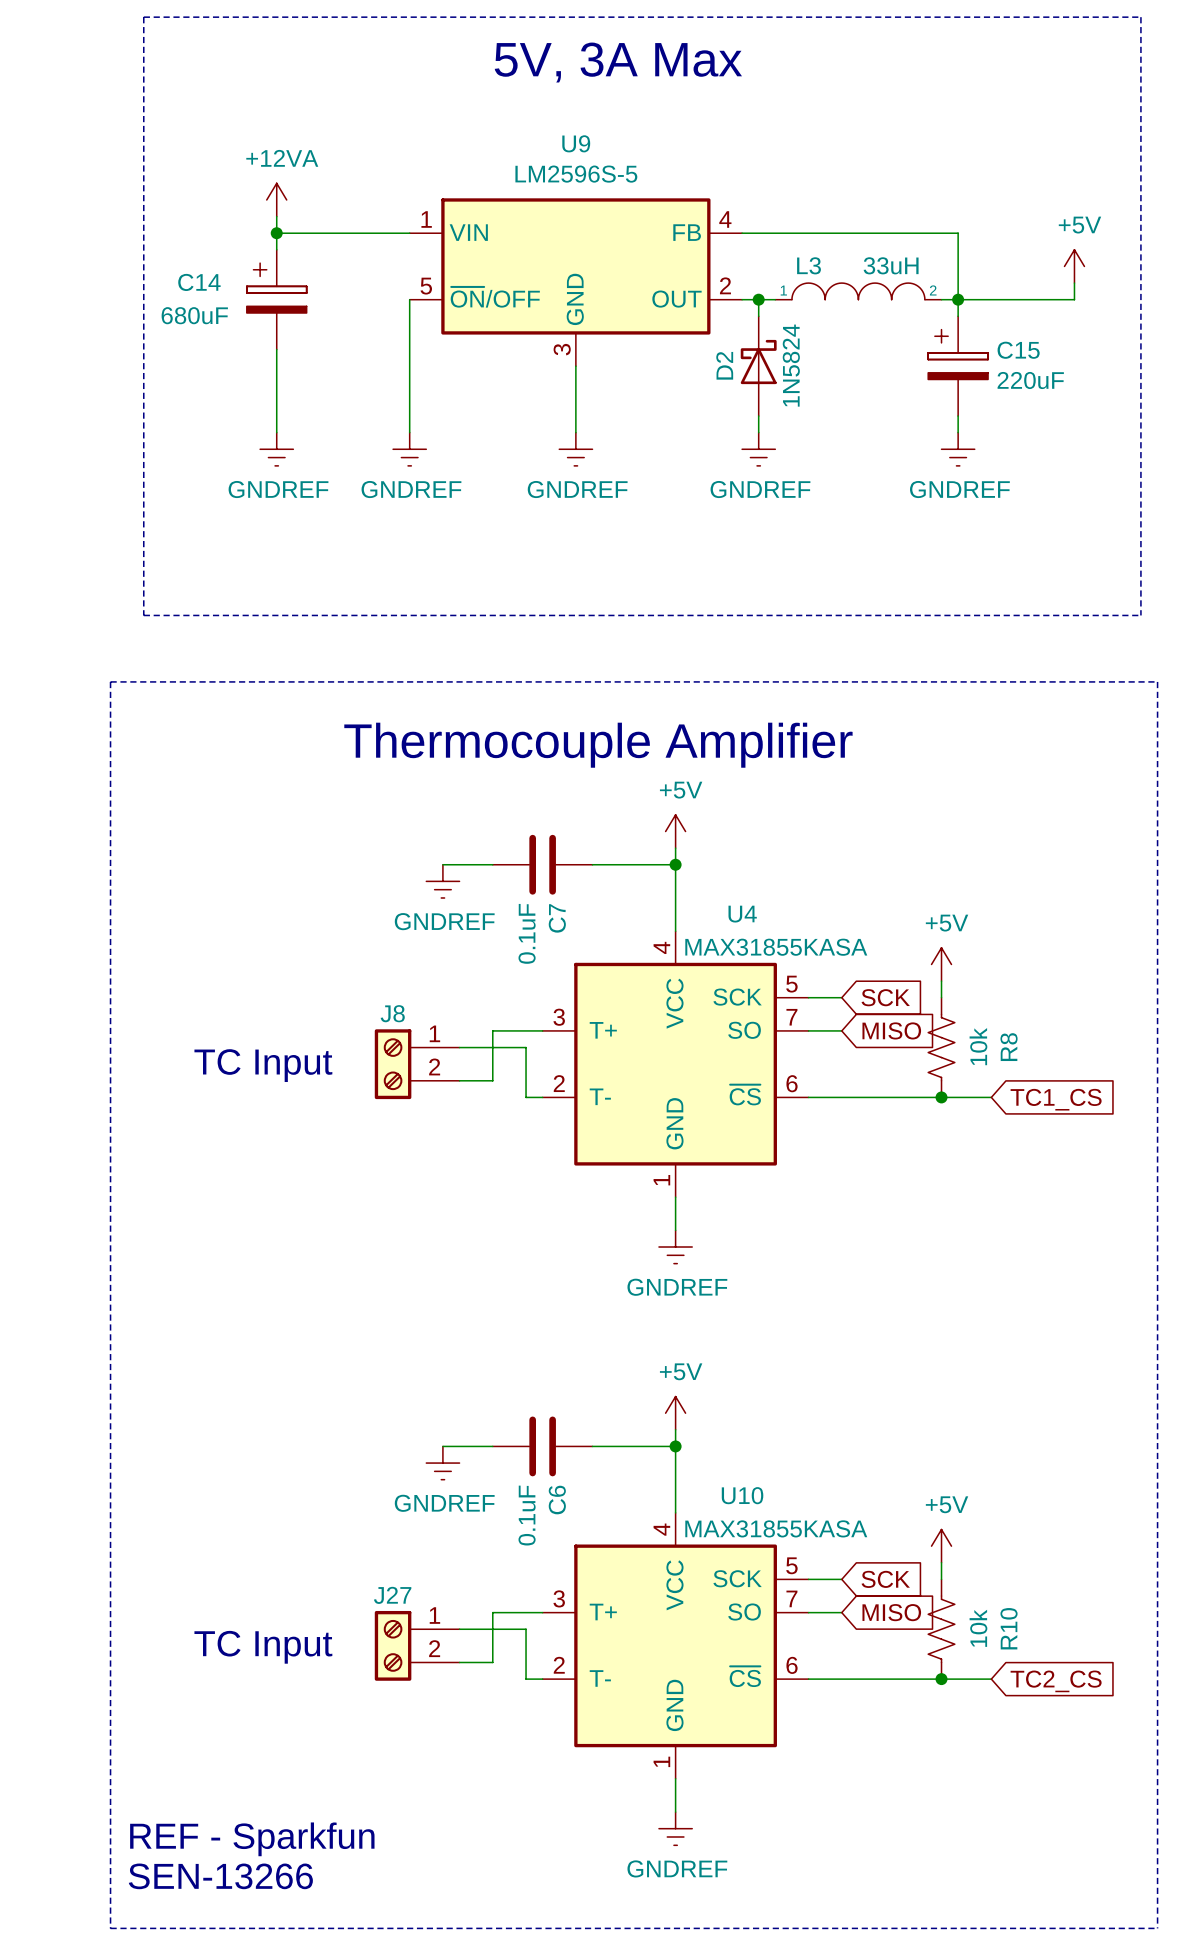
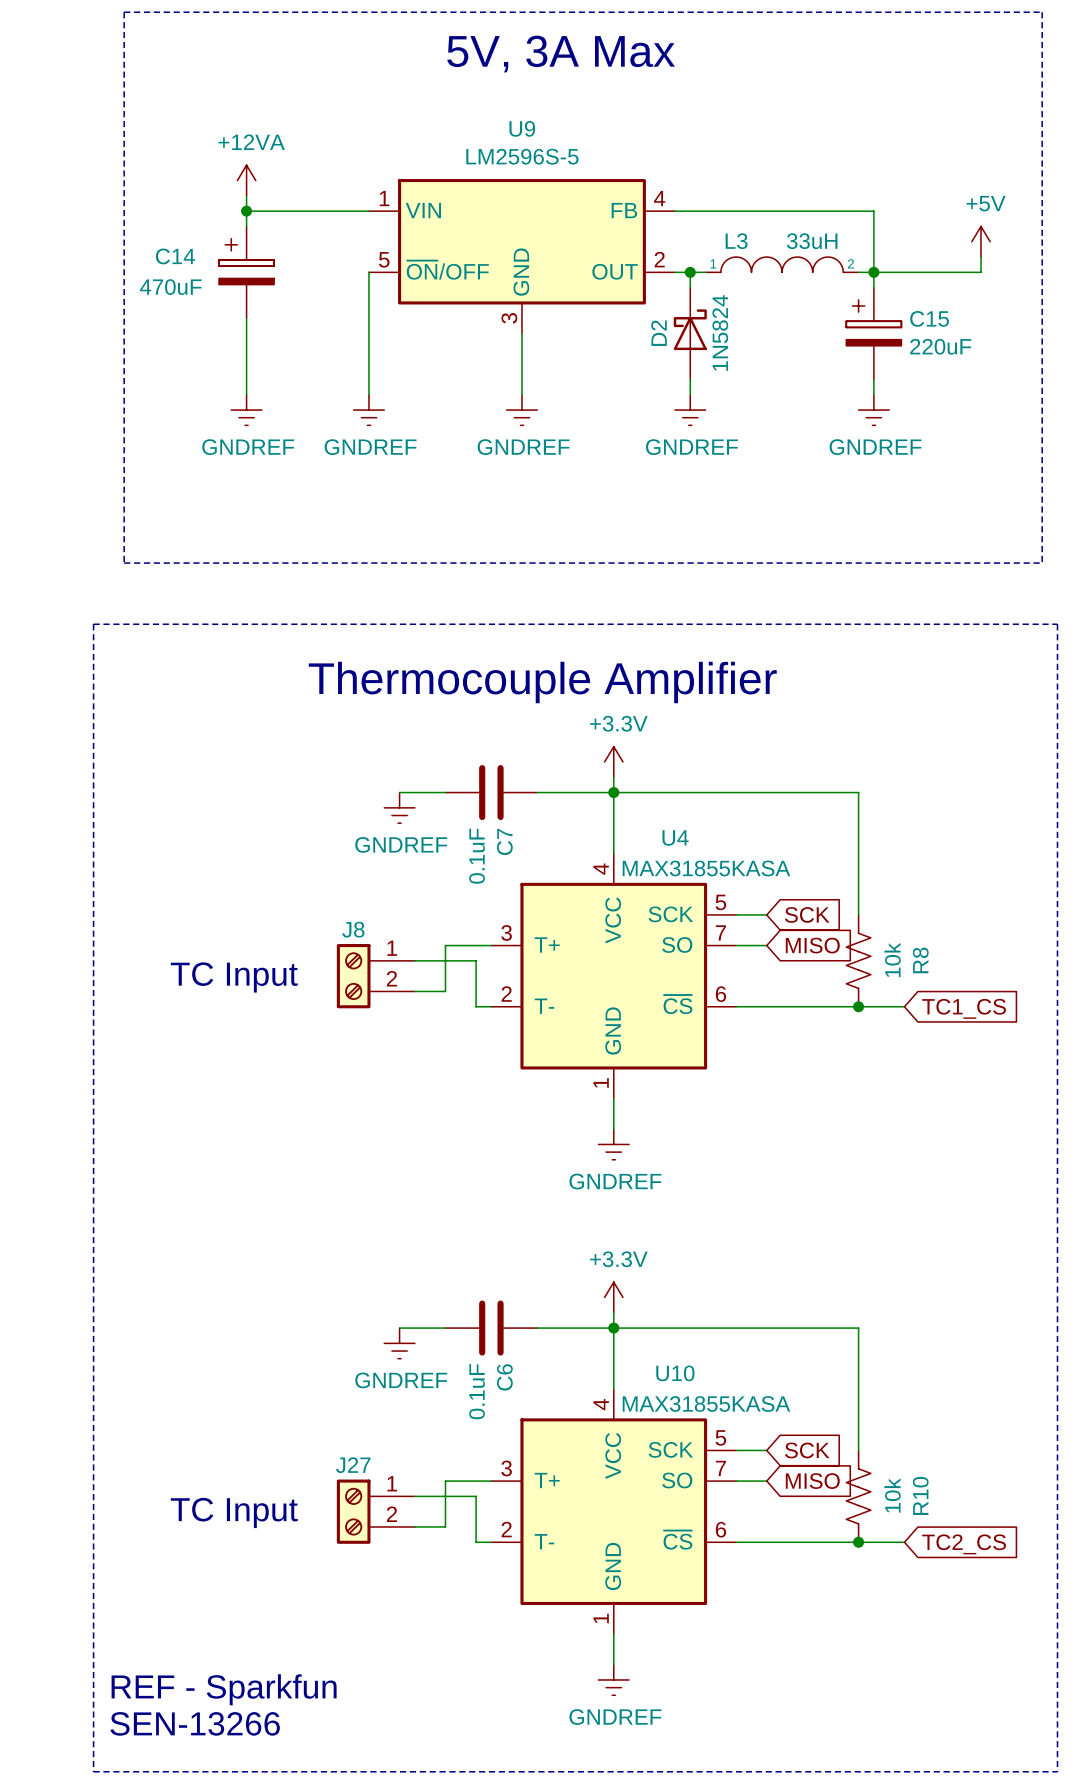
C14 value: 680uF (194, 315) -> 470uF (170, 287)
power symbol: +5V (675, 831) -> +3.3V (613, 761)
wire: none -> (613, 792) (858, 792) (858, 899)
power symbol: +5V (941, 964) -> none
power symbol: +5V (675, 1413) -> +3.3V (613, 1297)
wire: none -> (613, 1328) (858, 1328) (858, 1435)
power symbol: +5V (941, 1546) -> none

